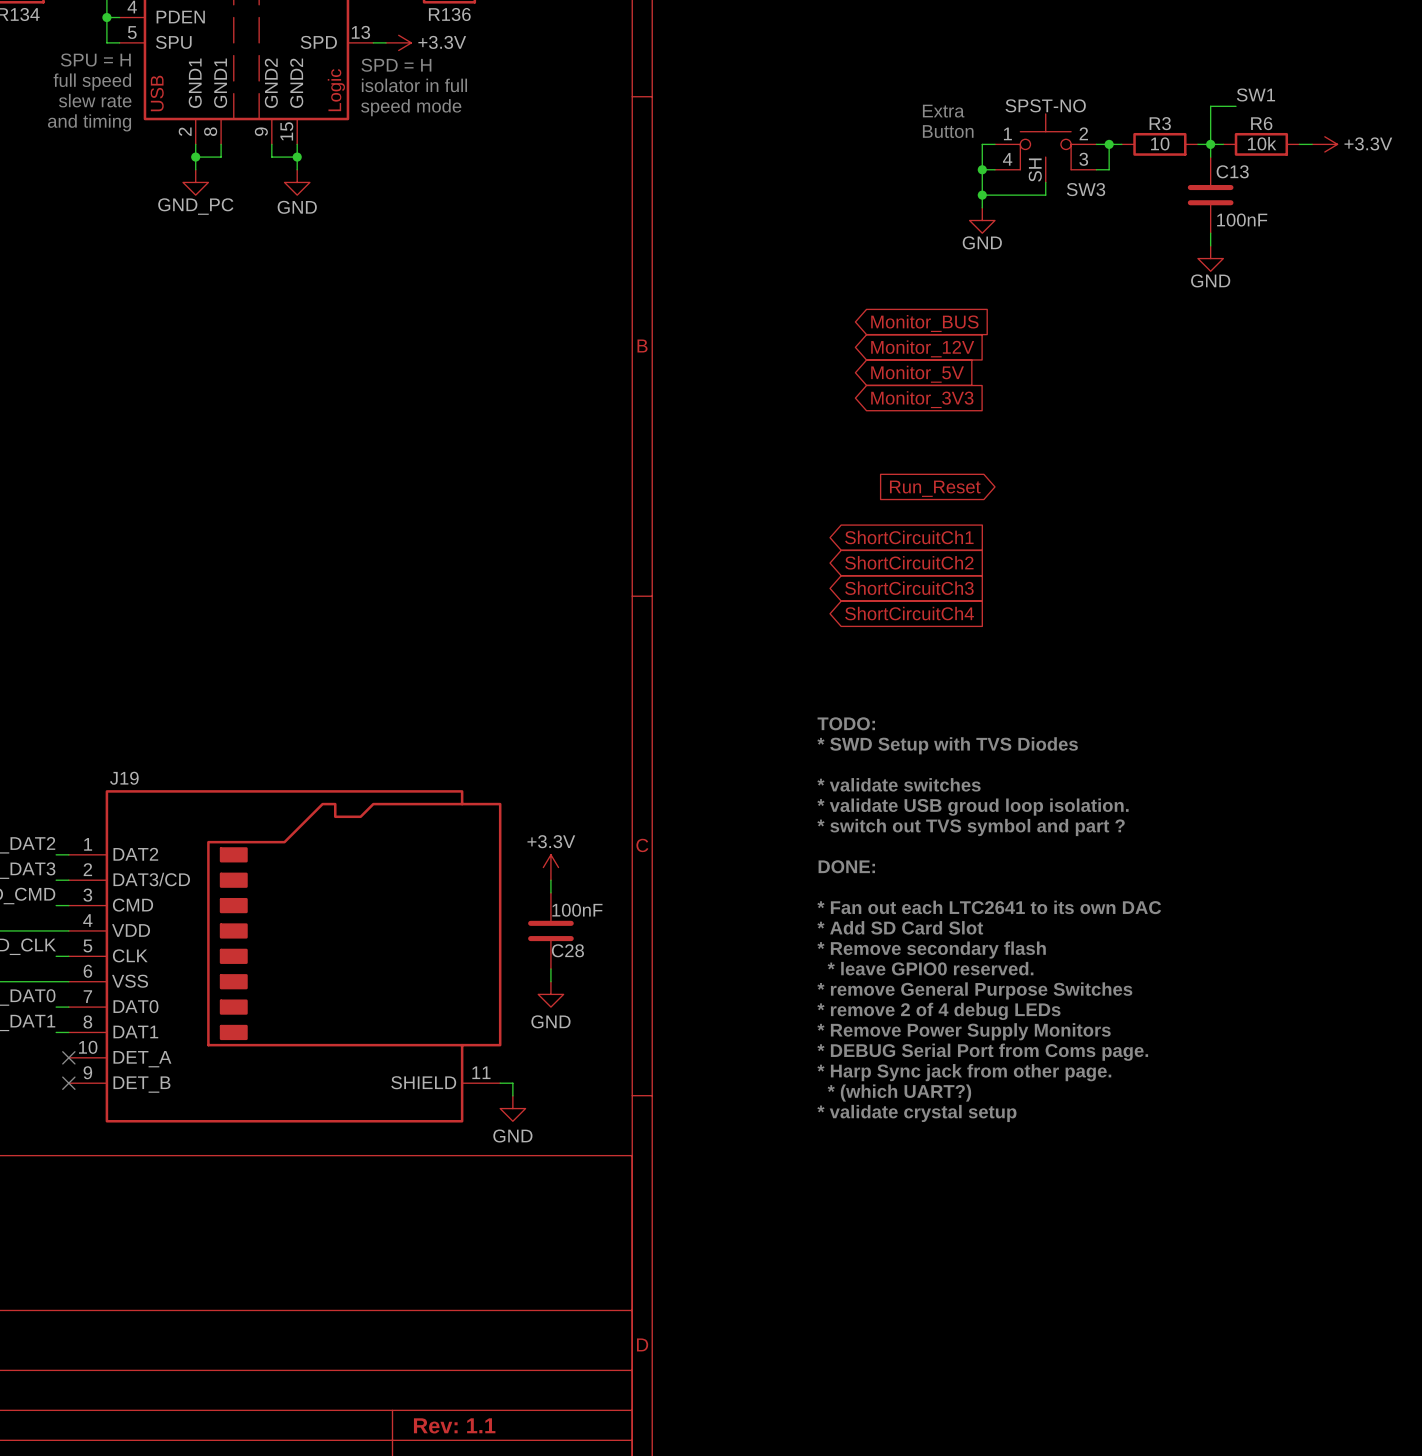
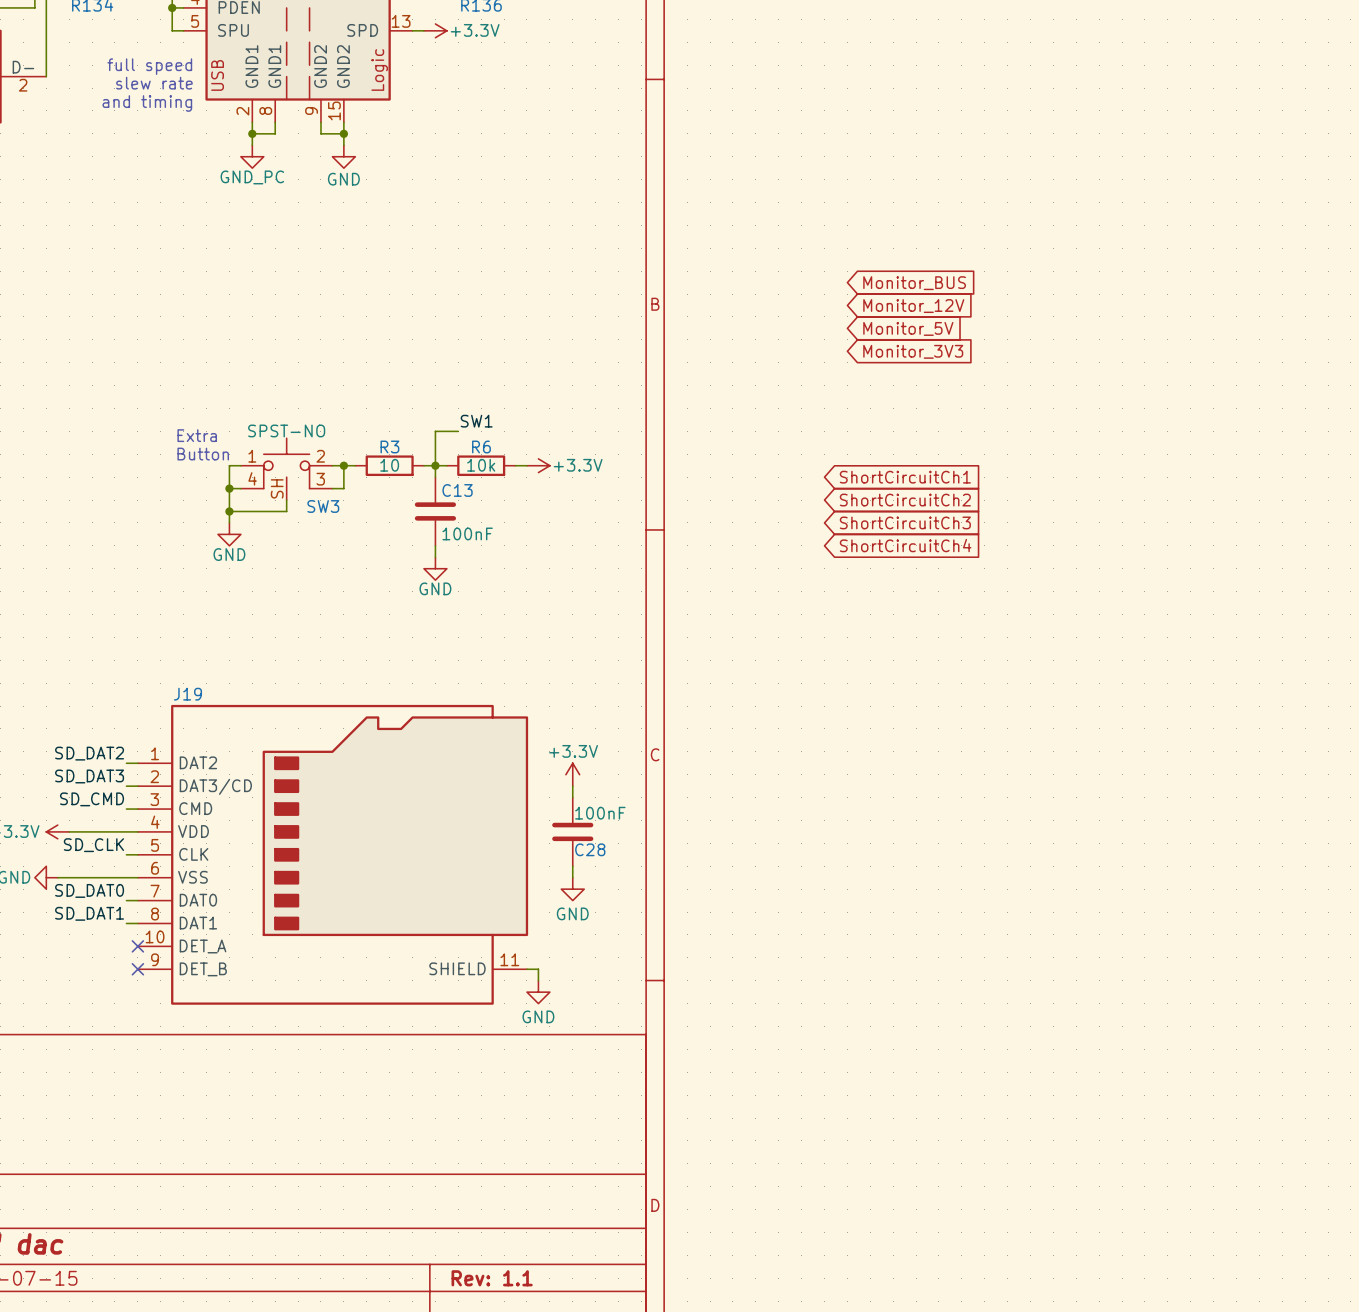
text: SPU = H (95, 60) -> none
text: SPD = H (396, 65) -> none
text: isolator in full (414, 85) -> none
label: SW1 (1255, 95) -> none
wire: (1236, 106) (1210, 106) (1210, 157) -> none
text: speed mode (411, 107) -> none
text: Extra (943, 111) -> none
text: Button (948, 131) -> none
wire: (994, 144) (982, 144) (982, 207) -> none
wire: (1096, 144) (1121, 144) -> none
wire: (1109, 144) (1109, 169) (1096, 169) -> none
junction: (1109, 144) -> none
R3 position: (1159, 144) -> (389, 465)
wire: (1197, 144) (1223, 144) -> none
junction: (1210, 144) -> none
R6 position: (1261, 144) -> (481, 465)
wire: (1299, 144) (1312, 144) -> none
power symbol: +3.3V (1324, 144) -> none
SW3 position: (1045, 148) -> (286, 469)
wire: (982, 169) (994, 169) -> none
junction: (982, 169) -> none
wire: (1045, 182) (1045, 195) (982, 195) -> none
junction: (982, 195) -> none
C13 position: (1210, 195) -> (435, 511)
power symbol: GND (982, 220) -> none
wire: (1210, 233) (1210, 245) -> none
power symbol: GND (1210, 258) -> none
label: none -> SW1 (476, 421)
wire: none -> (458, 431) (435, 431) (435, 477)
global label: Run_Reset (935, 488) -> none
text: none -> Extra (197, 435)
text: none -> Button (203, 454)
wire: none -> (240, 465) (229, 465) (229, 522)
wire: none -> (332, 465) (355, 465)
wire: none -> (343, 465) (343, 488) (332, 488)
junction: none -> (343, 465)
wire: none -> (423, 465) (446, 465)
junction: none -> (435, 465)
wire: none -> (515, 465) (526, 465)
power symbol: none -> +3.3V (538, 465)
wire: none -> (229, 488) (240, 488)
junction: none -> (229, 488)
wire: none -> (286, 500) (286, 511) (229, 511)
junction: none -> (229, 511)
power symbol: none -> GND (229, 534)
wire: none -> (435, 545) (435, 557)
power symbol: none -> GND (435, 568)
text: TODO: (846, 723) -> none
text: * SWD Setup with TVS Diodes (947, 745) -> none
text: * validate switches (899, 784) -> none
text: * validate USB groud loop isolation. (973, 807) -> none
text: * switch out TVS symbol and part ? (971, 827) -> none
text: DONE: (846, 866) -> none
text: * Fan out each LTC2641 to its own DAC (989, 907) -> none
text: * Add SD Card Slot (900, 927) -> none
text: * Remove secondary flash (931, 950) -> none
text: * leave GPIO0 reserved. (930, 968) -> none
text: * remove General Purpose Switches (974, 990) -> none
text: * remove 2 of 4 debug LEDs (938, 1011) -> none
text: * Remove Power Supply Monitors (964, 1031) -> none
text: * DEBUG Serial Port from Coms page. (982, 1052) -> none
text: * Harp Sync jack from other page. (964, 1072) -> none
text: * (which UART?) (899, 1093) -> none
text: * validate crystal setup (916, 1113) -> none

